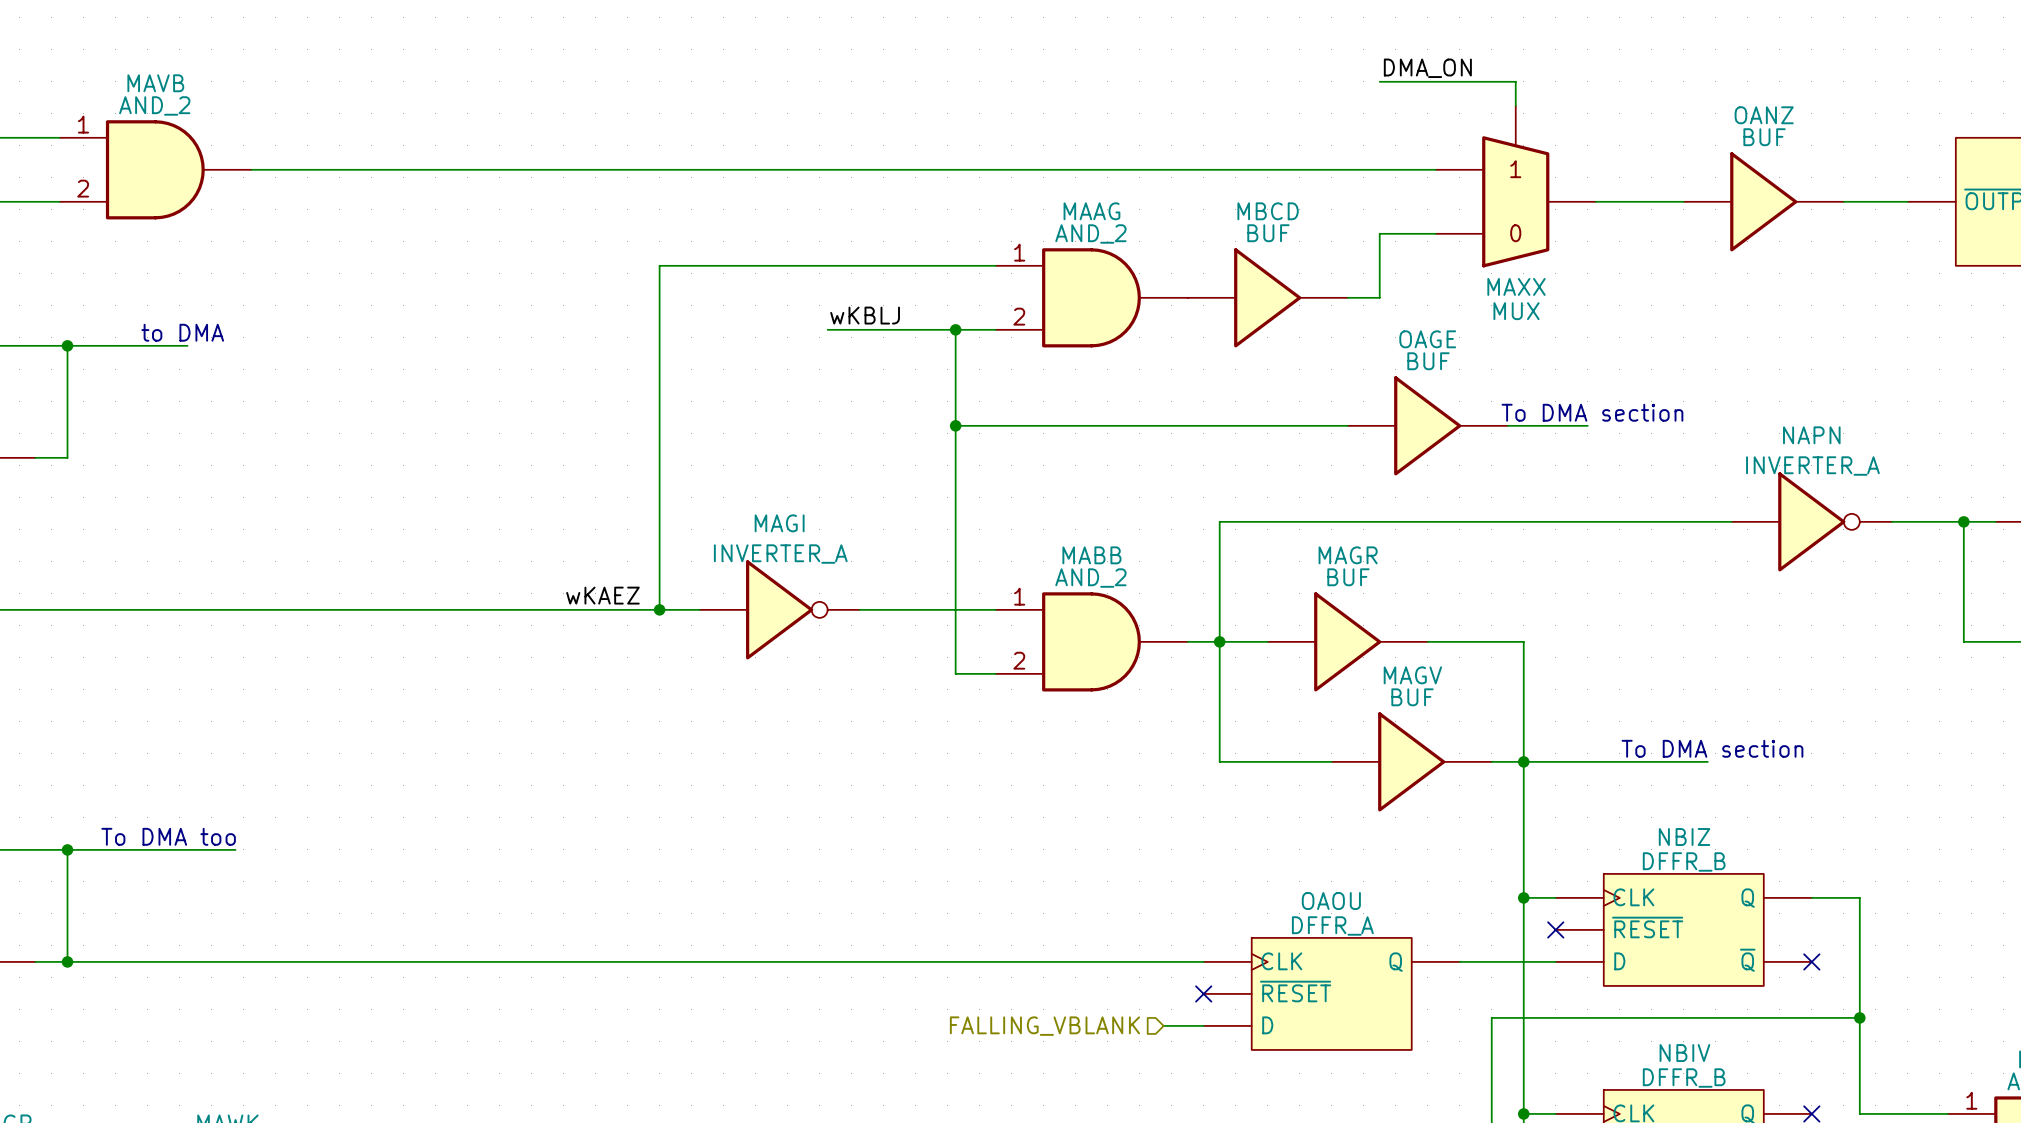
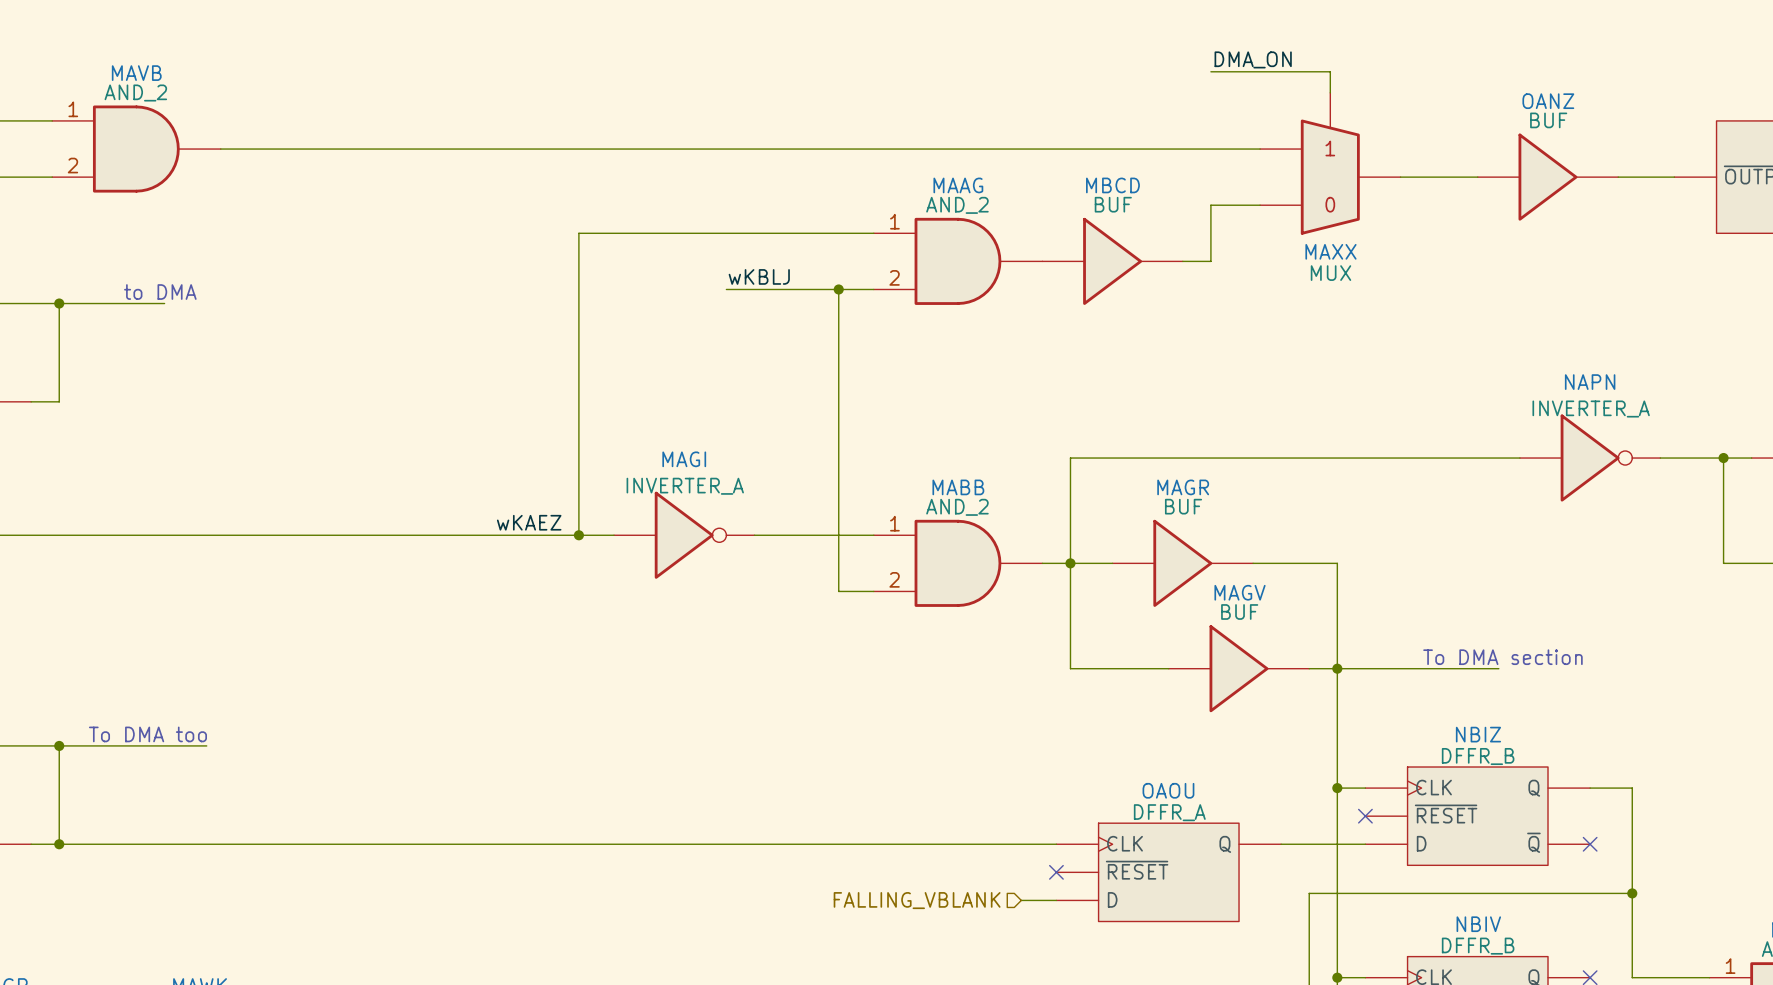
text: To DMA section (1592, 412) -> none
wire: (955, 425) (1347, 425) -> none
junction: (955, 425) -> none
OAGE: BUF (1427, 425) -> none
wire: (1507, 425) (1587, 425) -> none

